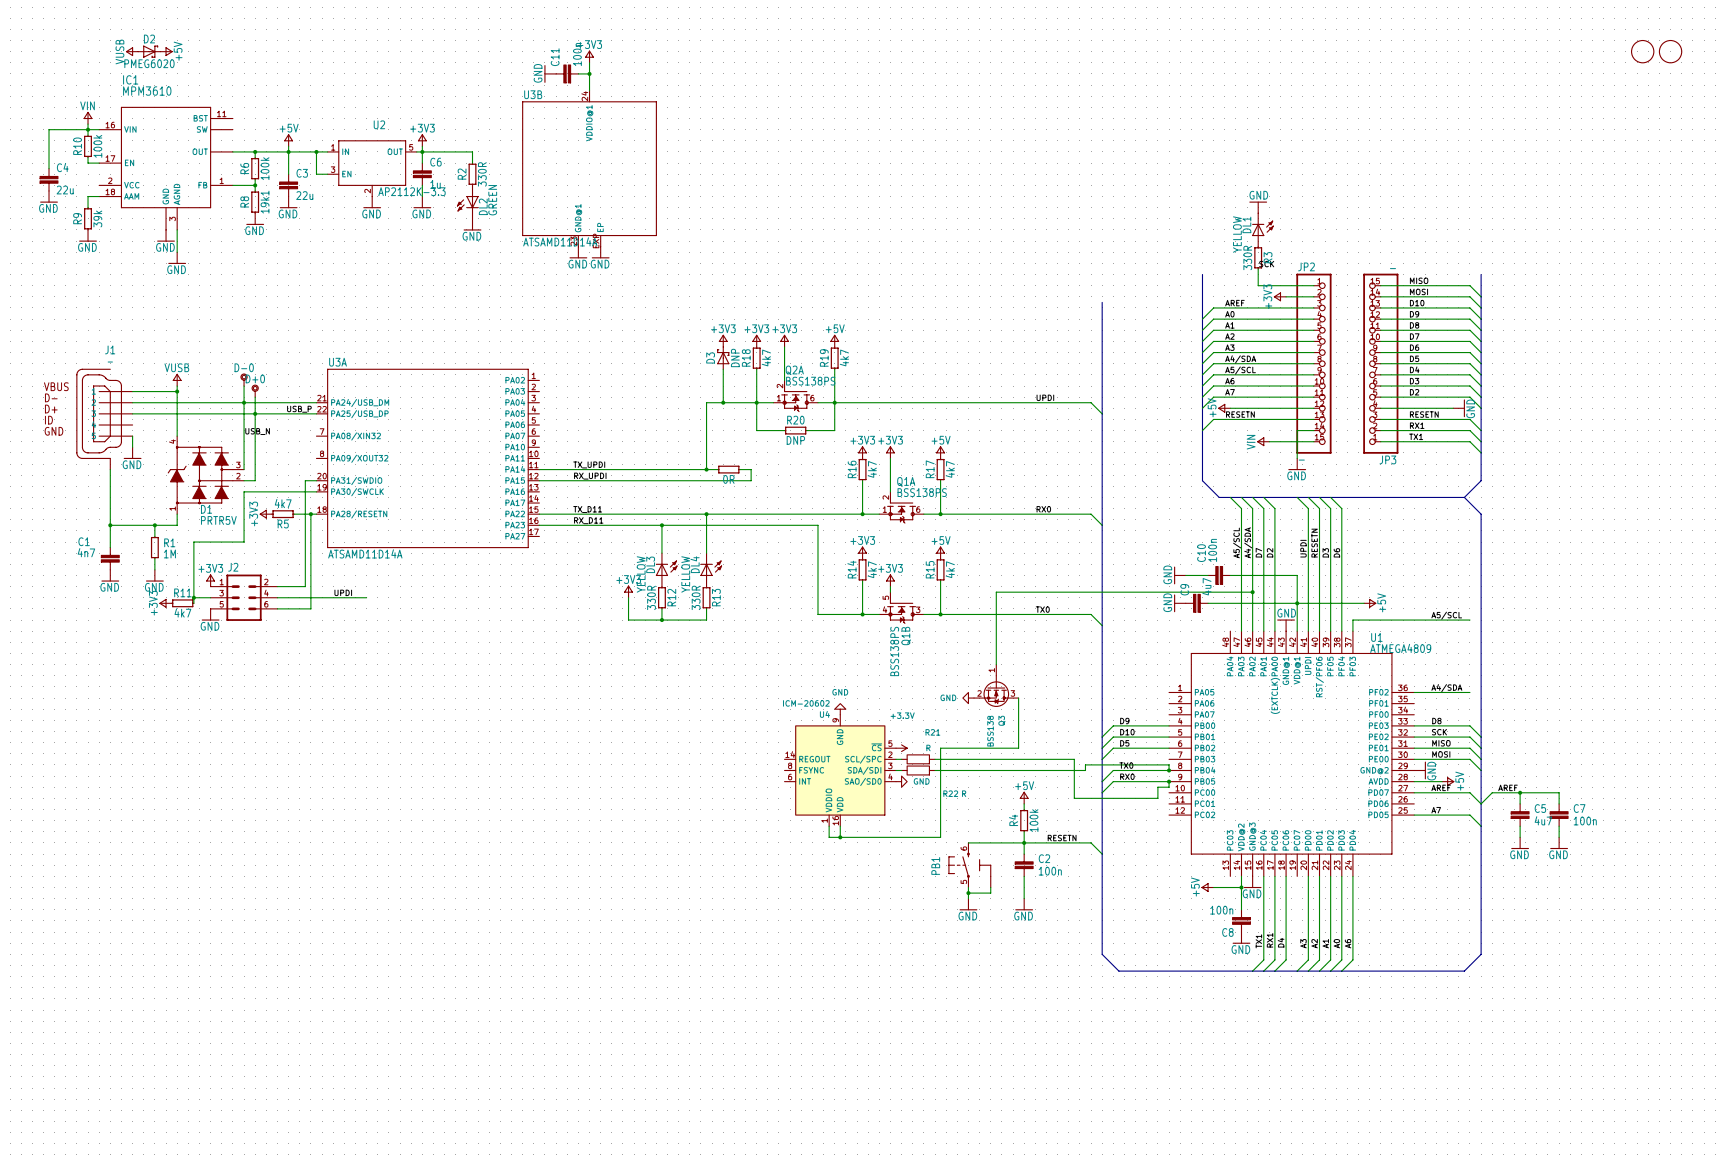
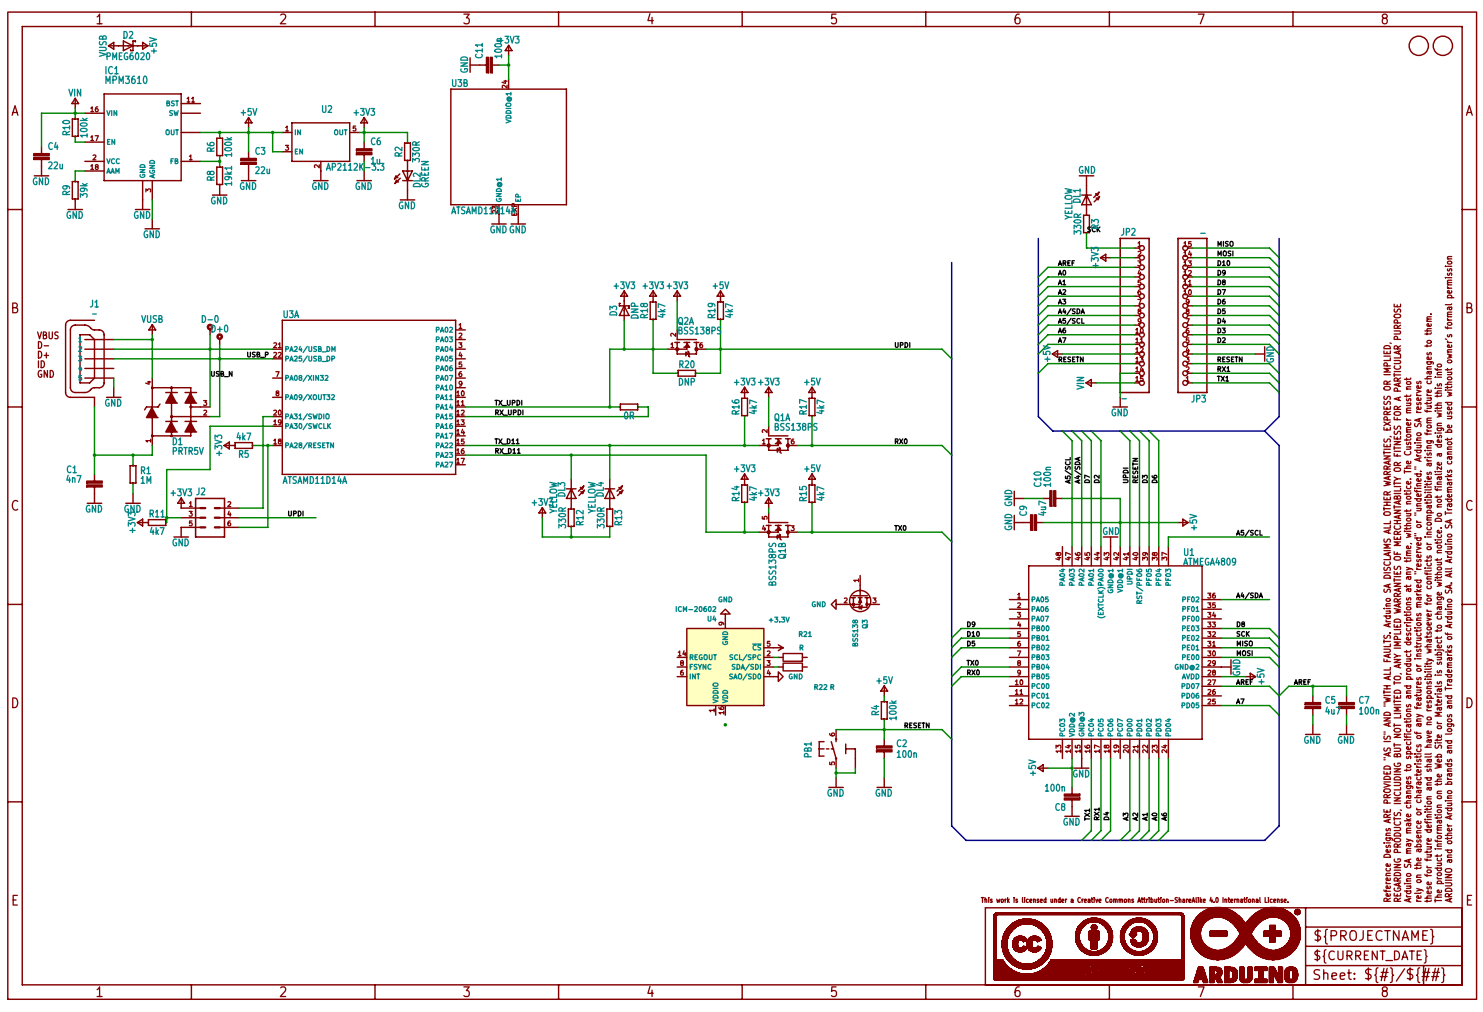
part: none -> (742, 505)
wire: (1252, 592) (996, 592) (996, 664) -> none
junction: (1252, 592) -> none
wire: (1018, 698) (1018, 748) (940, 748) (940, 837) (829, 837) (829, 826) -> none
wire: (935, 759) (1074, 759) (1074, 798) (1157, 798) (1157, 787) (1169, 787) (1169, 781) -> none
wire: (935, 770) (1085, 770) (1085, 764) (1169, 764) (1169, 770) -> none
junction: (1169, 770) -> none
junction: (1169, 781) -> none
wire: (840, 826) (840, 837) -> none

